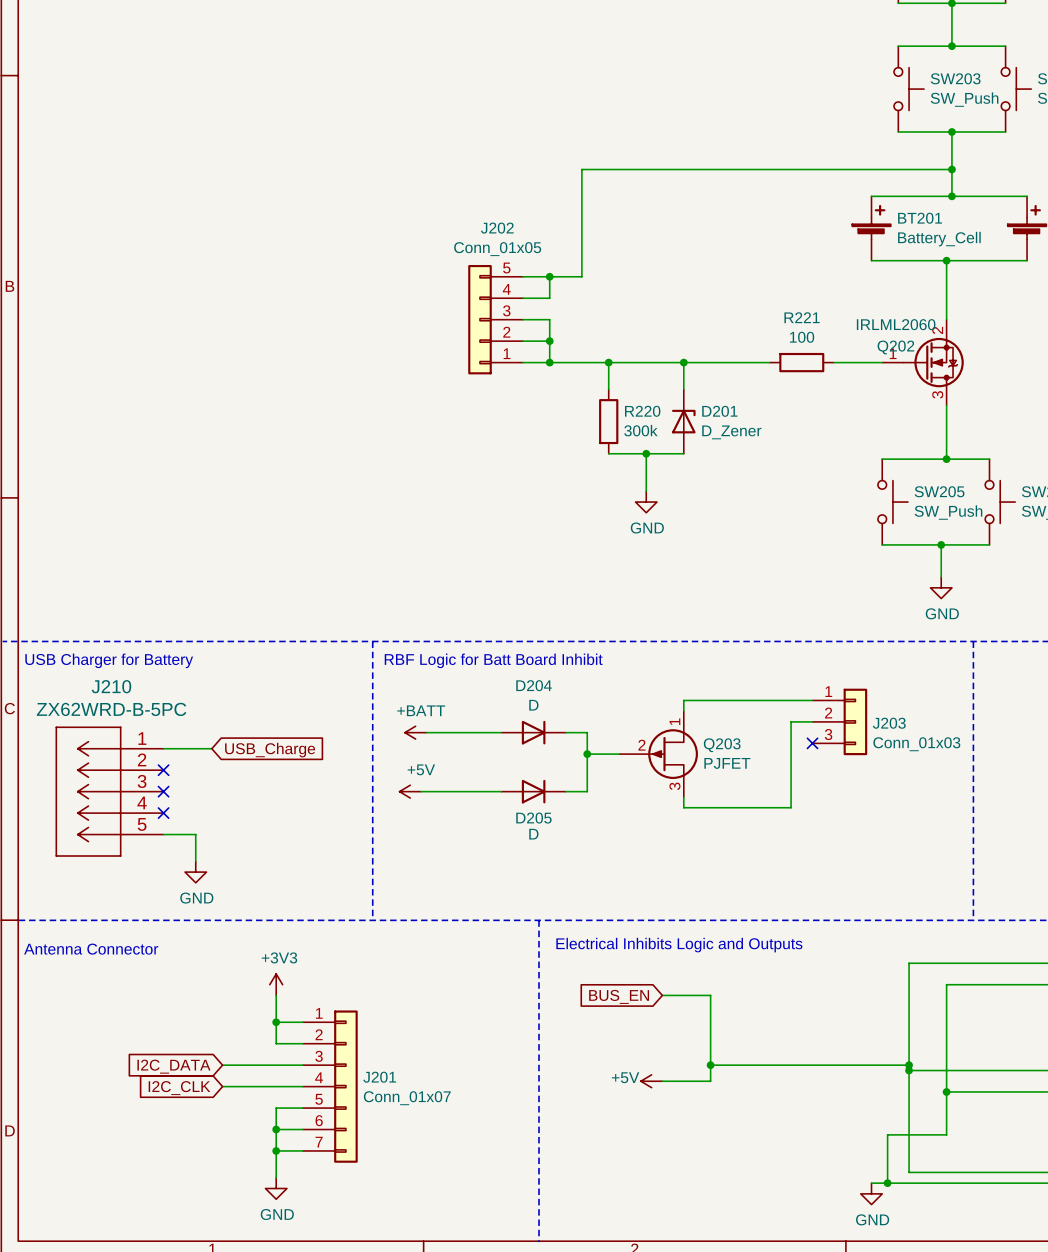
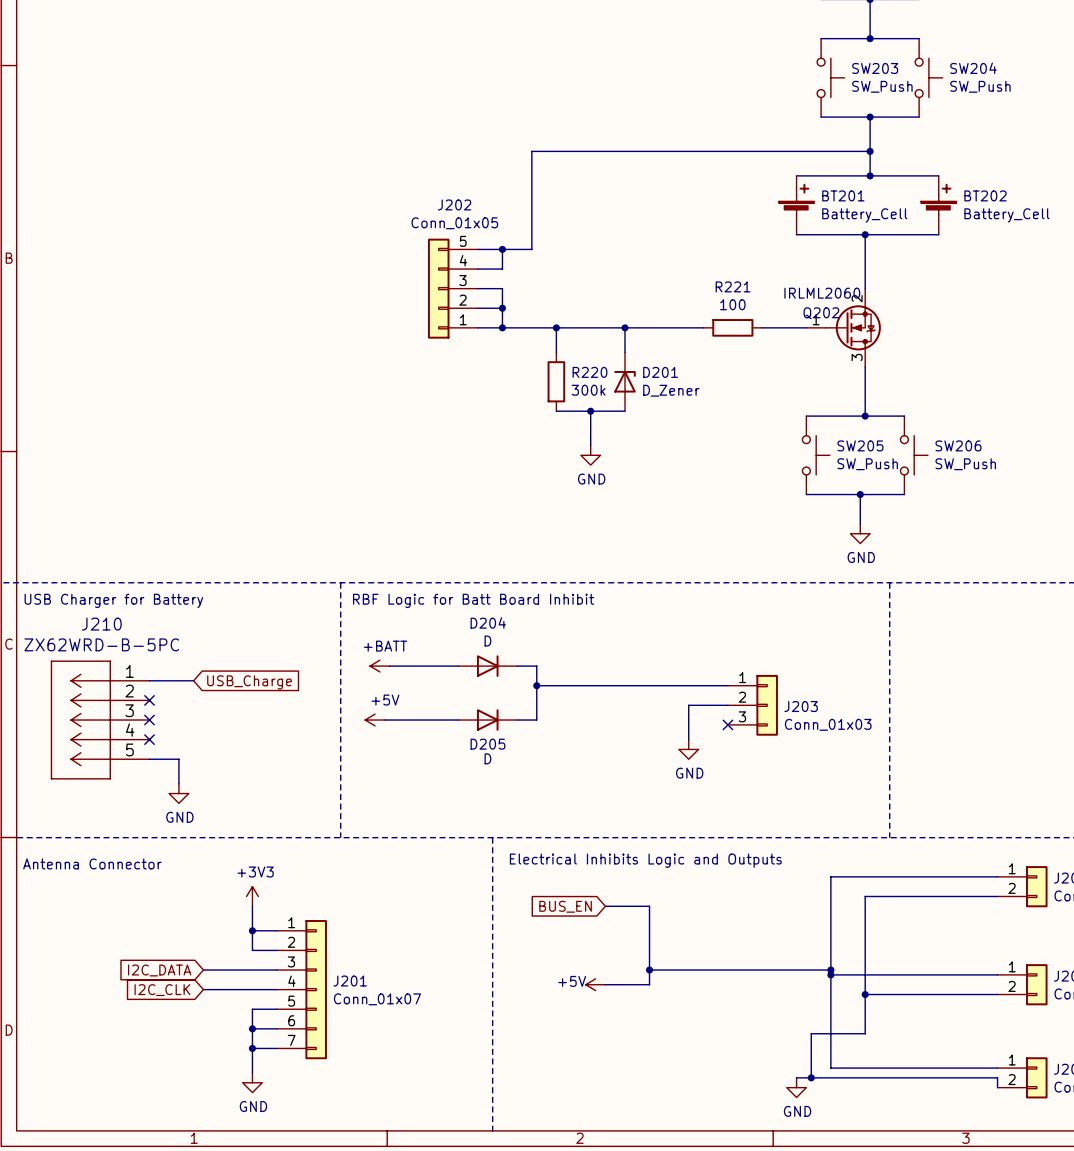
wire: (812, 700) (683, 700) (683, 711) -> none
wire: (812, 721) (791, 721) (791, 807) (683, 807) (683, 797) -> none
J203 position: (839, 721) -> (752, 705)
no-connect mark: (812, 743) -> none
wire: none -> (566, 685) (727, 685)
Q203: PJFET (658, 754) -> none
wire: none -> (727, 705) (688, 705) (688, 739)
no-connect mark: none -> (727, 724)
power symbol: none -> GND (688, 749)

